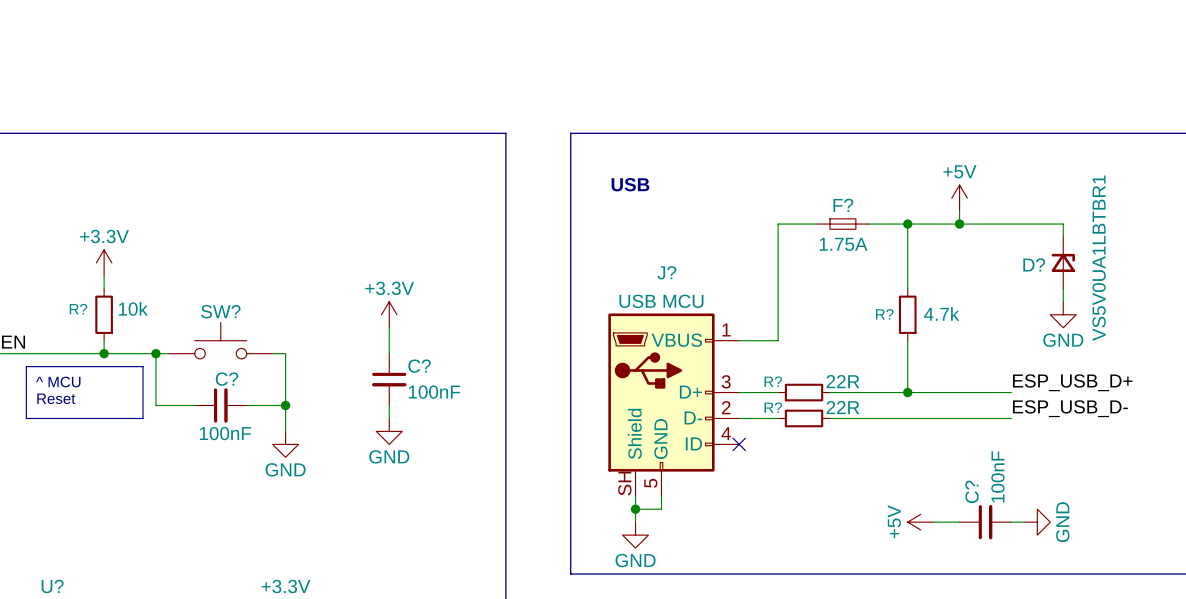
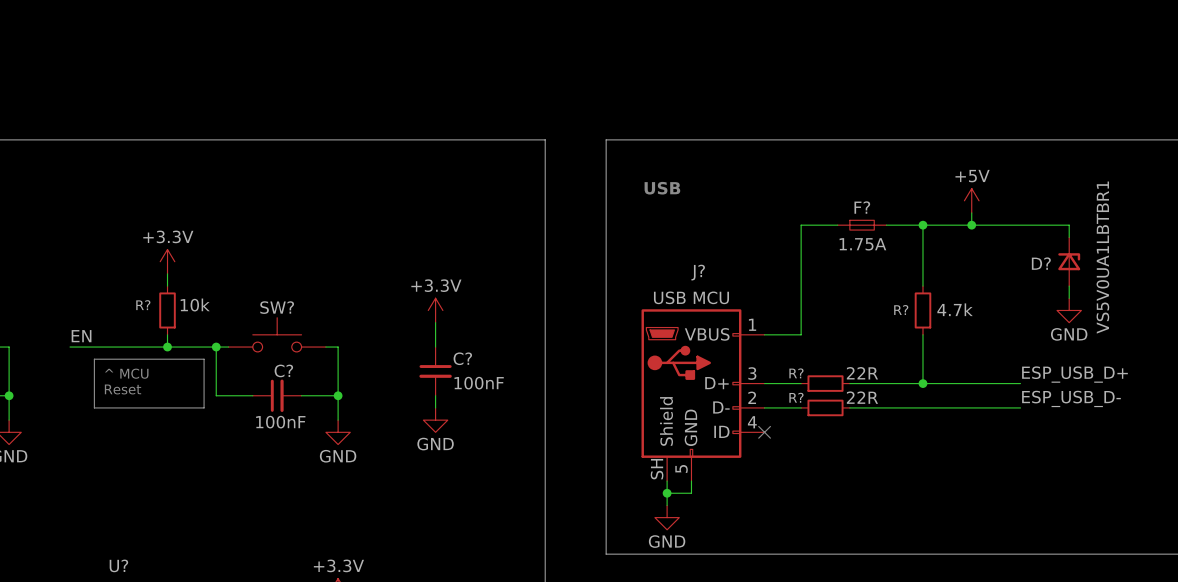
power symbol: +5V (920, 522) -> none
wire: (933, 522) (959, 522) -> none
C?: 100nF (985, 522) -> none
wire: (1011, 522) (1024, 522) -> none
power symbol: GND (1037, 522) -> none

